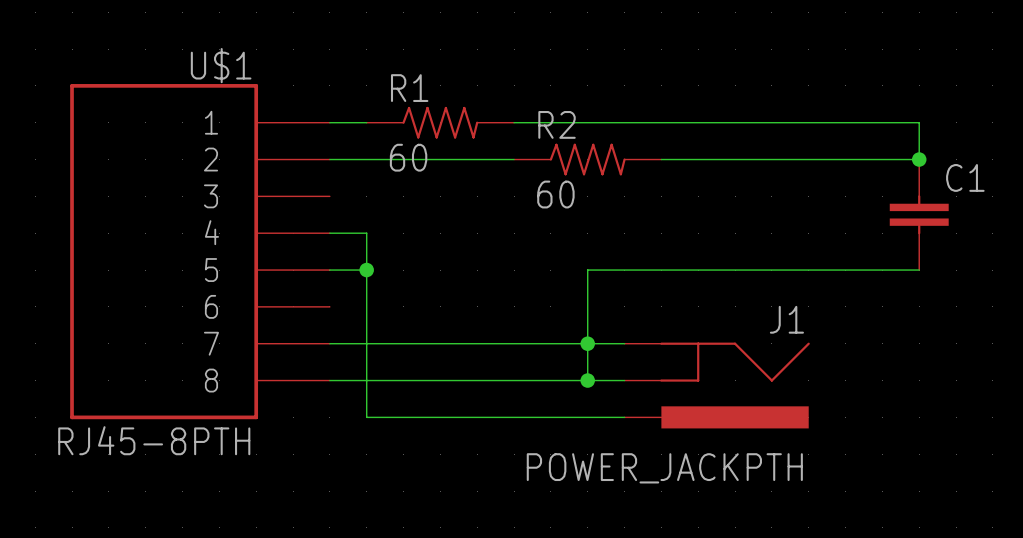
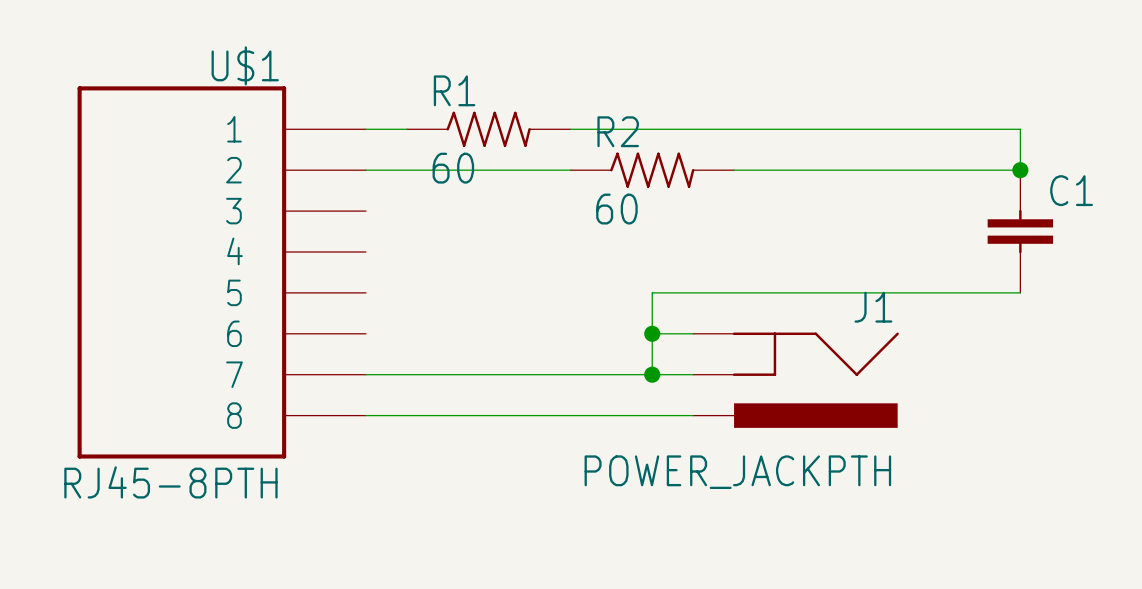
wire: (329, 233) (366, 233) (366, 417) (624, 417) -> none
wire: (329, 270) (366, 270) -> (652, 333) (693, 333)
junction: (366, 270) -> none
wire: (587, 343) (587, 380) -> none
junction position: (587, 380) -> (652, 333)
J1 position: (717, 385) -> (796, 380)

